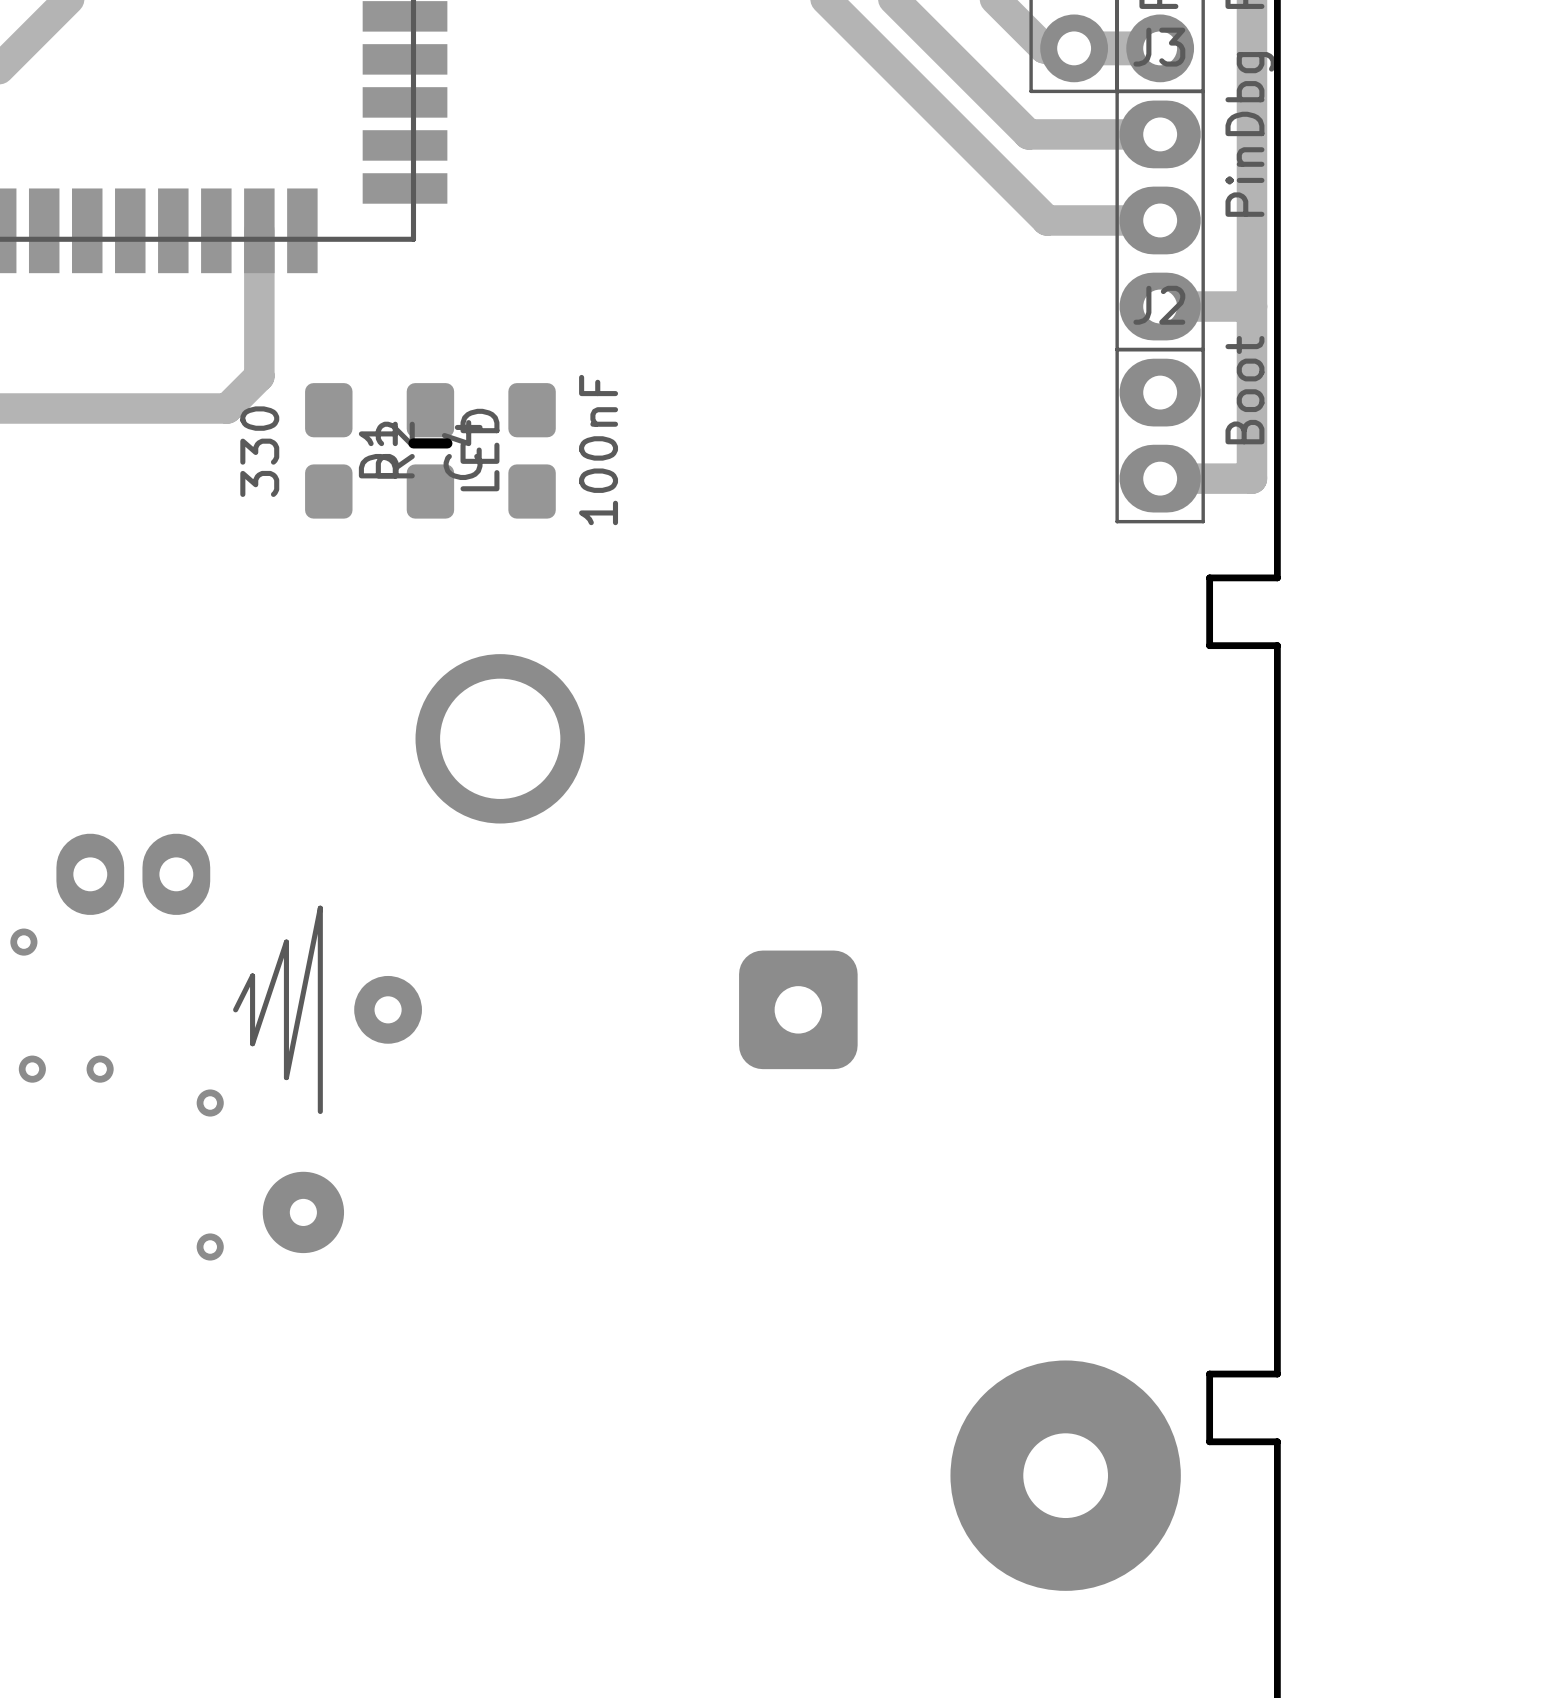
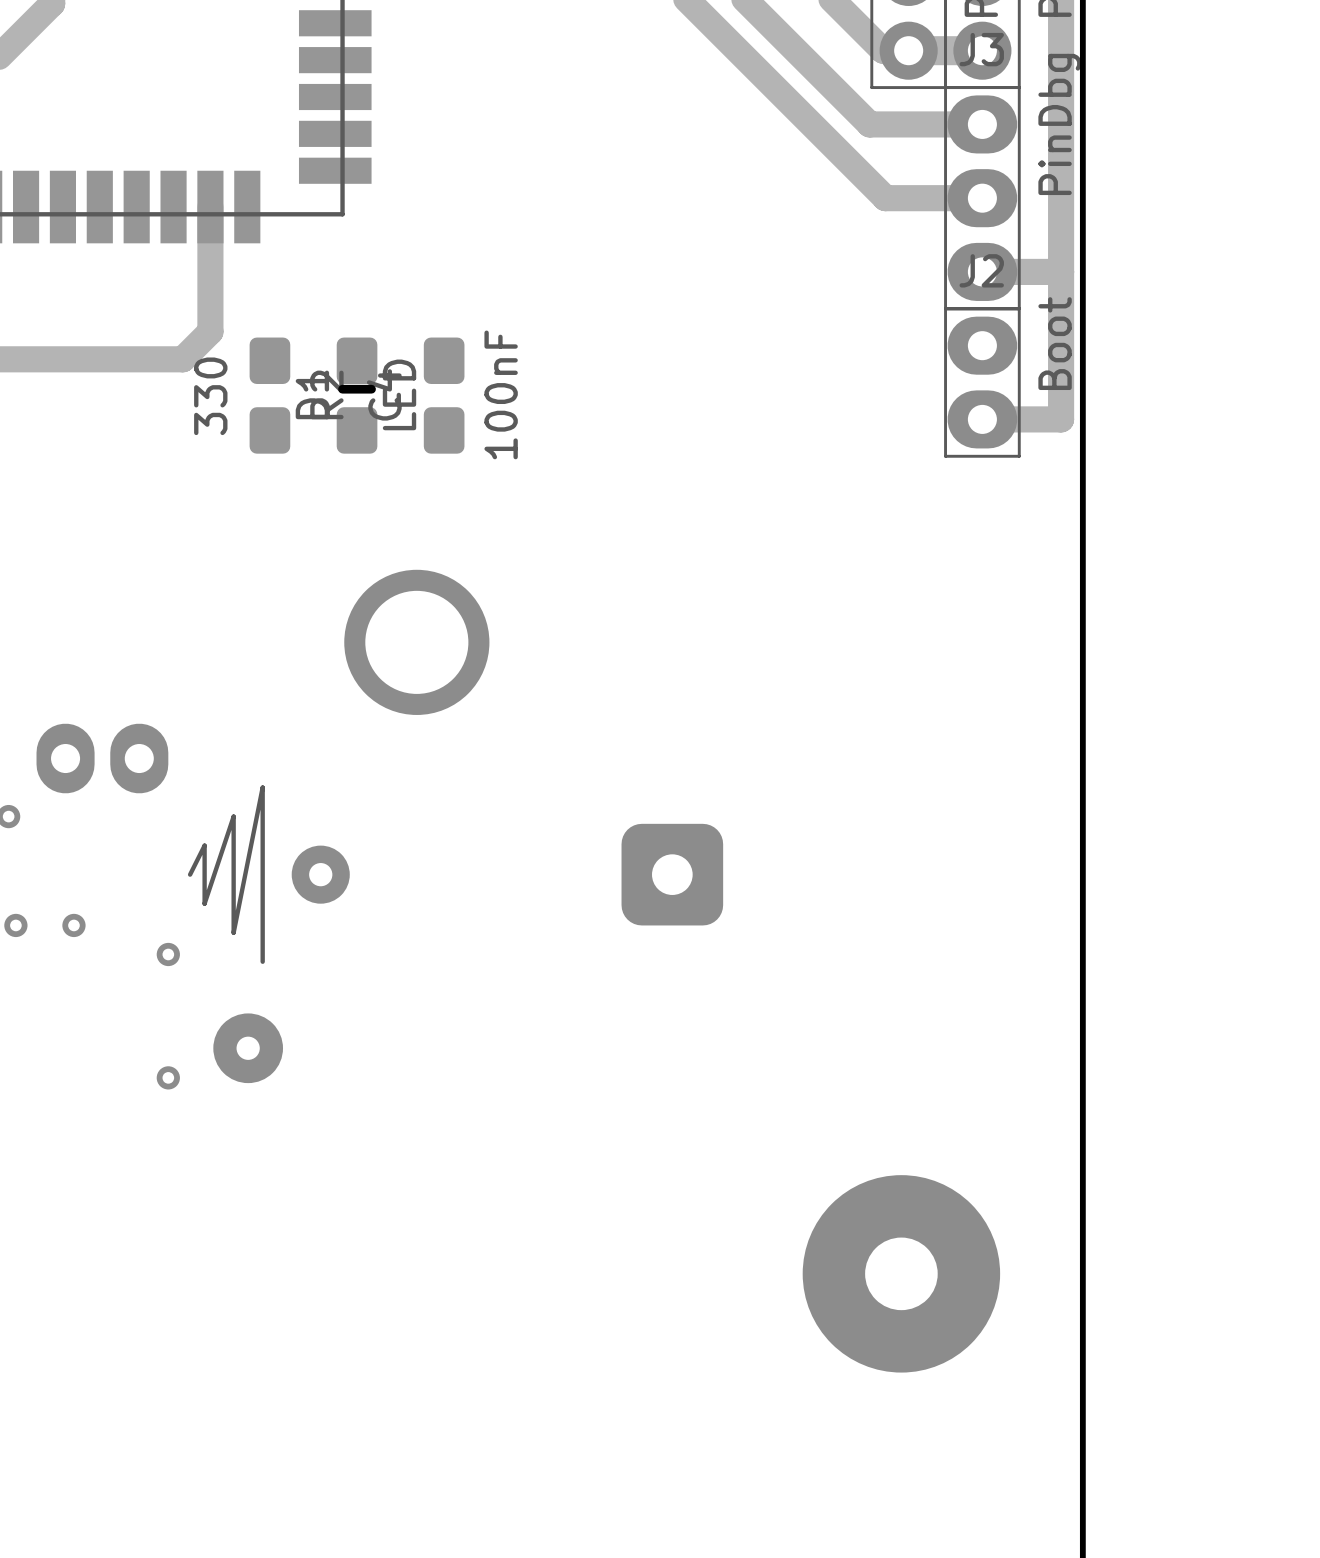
board edge: (1277, 577) (1209, 577) (1209, 645) (1277, 645) -> (1082, 504) (1082, 562)
board edge: (1277, 1374) (1209, 1374) (1209, 1441) (1277, 1441) -> (1082, 1186) (1082, 1244)

